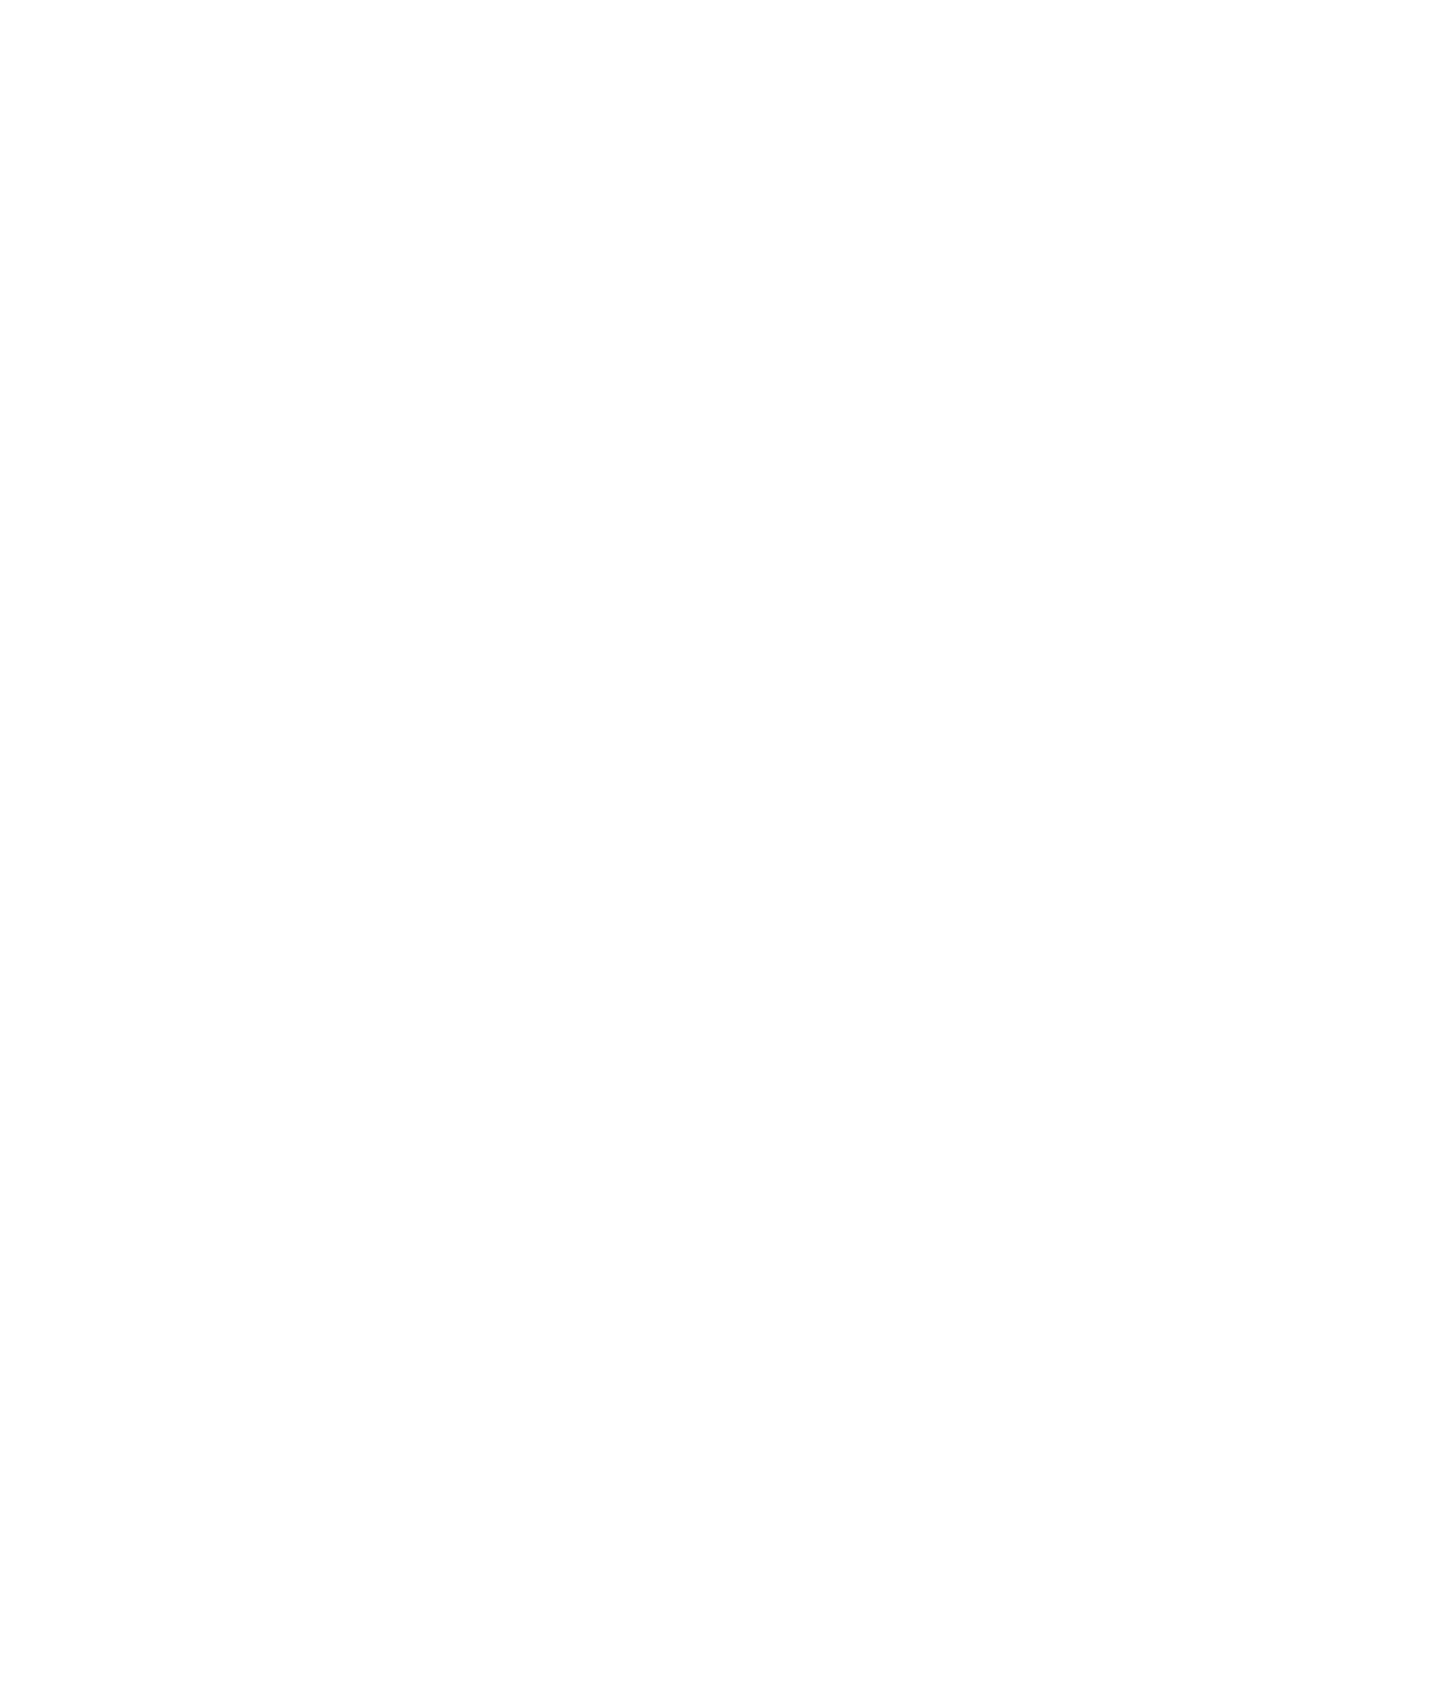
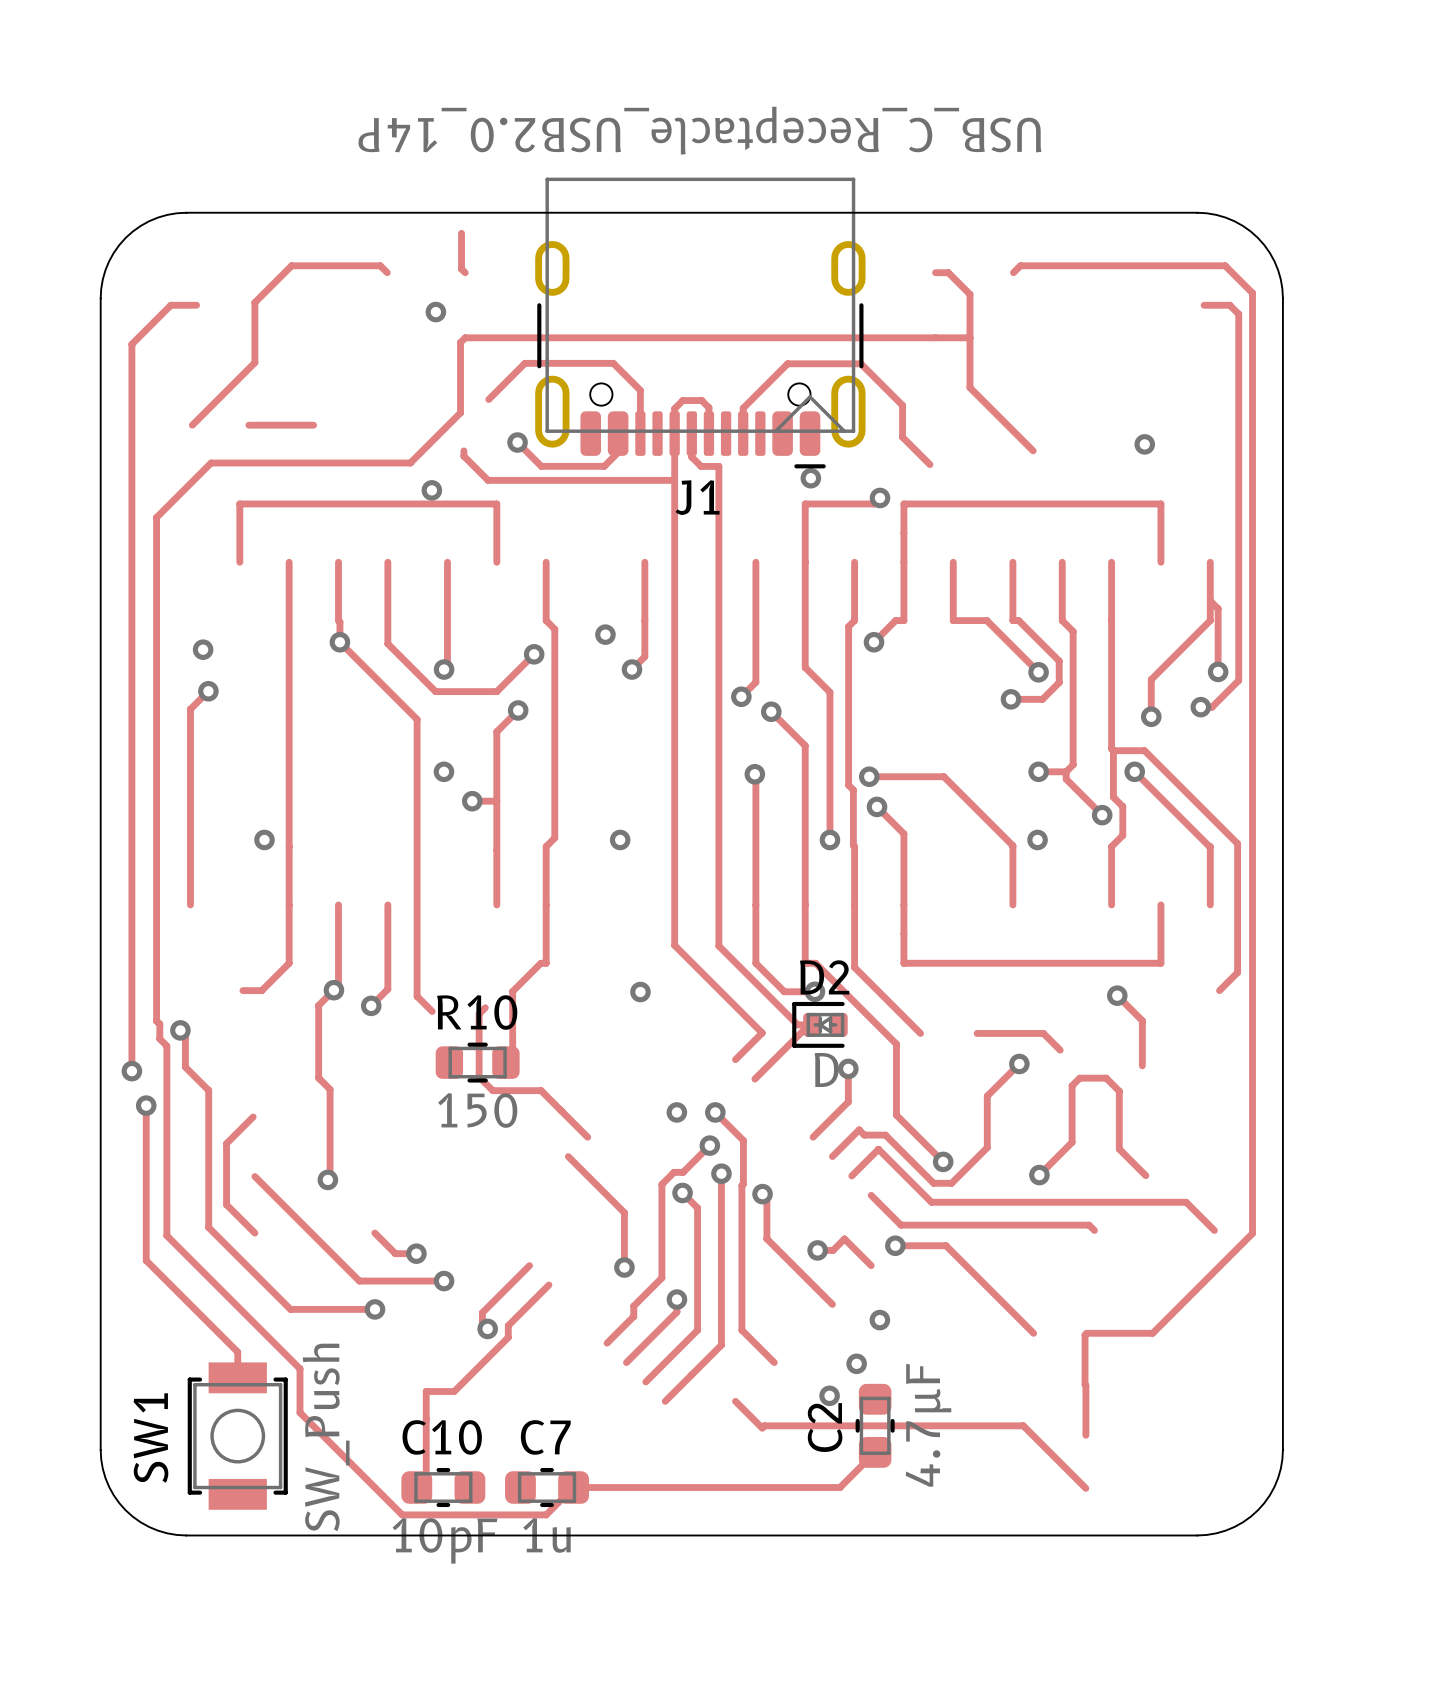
board edge: none -> (186, 212) (1197, 212) (1216, 214) (1234, 221) (1250, 231) (1264, 244) (1278, 270) (1282, 298) (1282, 1449) (1280, 1468) (1274, 1486) (1264, 1503) (1250, 1516) (1225, 1530) (1197, 1535) (186, 1535) (167, 1533) (149, 1527) (132, 1516) (119, 1503) (105, 1478) (100, 1449) (100, 298) (105, 270) (113, 252) (125, 237) (149, 221) (167, 214) (186, 212)
track: none -> (461, 233) (461, 269) (465, 272)
track: none -> (387, 272) (380, 265) (291, 265) (254, 302) (254, 362) (192, 425)
track: none -> (935, 272) (948, 272) (969, 294) (969, 387) (1033, 450)
track: none -> (1013, 272) (1020, 265) (1225, 265) (1252, 293) (1252, 1233) (1152, 1333) (1086, 1333) (1085, 1335) (1085, 1435)
track: none -> (196, 305) (170, 305) (131, 344) (131, 1071)
track: none -> (1204, 305) (1229, 305) (1238, 314) (1238, 680) (1212, 707) (1200, 707)
via: none -> (435, 312)
J1: none -> USB_C_Receptacle_USB2.0_14P (700, 323)
track: none -> (969, 337) (465, 337) (460, 342) (460, 412) (410, 463) (211, 463) (156, 517) (156, 1020) (159, 1024) (159, 1038) (166, 1046) (166, 1235) (300, 1368) (300, 1412) (402, 1514) (546, 1514) (573, 1487) (840, 1487) (875, 1452)
track: none -> (488, 399) (524, 363) (613, 363) (640, 390) (640, 433)
track: none -> (248, 425) (313, 425)
track: none -> (618, 433) (618, 452) (604, 466) (541, 466) (517, 442)
track: none -> (691, 433) (691, 457) (701, 466) (718, 466) (718, 946) (797, 1024) (811, 1024)
track: none -> (708, 433) (708, 407) (701, 400) (682, 400) (674, 408) (674, 945) (762, 1032) (735, 1059)
track: none -> (743, 433) (743, 408) (787, 363) (860, 363) (902, 405) (902, 437) (929, 464)
via: none -> (517, 442)
via: none -> (1144, 444)
track: none -> (463, 450) (463, 456) (488, 480) (674, 480)
via: none -> (810, 478)
via: none -> (431, 490)
track: none -> (880, 497) (874, 503) (805, 503) (805, 667) (829, 692) (829, 840)
via: none -> (880, 497)
track: none -> (239, 562) (239, 503) (496, 503) (496, 562)
track: none -> (289, 562) (289, 963) (261, 990) (242, 990)
track: none -> (338, 562) (339, 642) (417, 719) (417, 996) (432, 1011)
track: none -> (387, 562) (387, 643) (435, 691) (496, 691) (534, 654)
track: none -> (447, 562) (447, 666) (444, 669)
track: none -> (546, 562) (546, 620) (554, 629) (554, 838) (546, 846) (546, 963) (540, 963) (512, 991) (512, 1055) (505, 1062)
track: none -> (644, 562) (644, 656) (631, 669)
track: none -> (755, 562) (755, 682) (741, 696)
track: none -> (854, 562) (854, 620) (848, 626) (848, 785) (853, 790) (854, 967) (920, 1033)
track: none -> (953, 562) (953, 620) (986, 620) (1038, 672)
track: none -> (1012, 562) (1012, 620) (1018, 620) (1059, 661) (1059, 682) (1042, 699) (1010, 699)
track: none -> (1062, 562) (1062, 620) (1073, 631) (1073, 764) (1066, 771)
track: none -> (1111, 562) (1111, 748) (1113, 750)
track: none -> (1160, 562) (1160, 503) (903, 503) (903, 620) (895, 620) (874, 642)
track: none -> (1210, 562) (1210, 620) (1151, 679) (1151, 716)
track: none -> (1210, 600) (1218, 608) (1218, 671)
via: none -> (605, 634)
via: none -> (339, 642)
via: none -> (874, 642)
via: none -> (203, 649)
via: none -> (534, 654)
via: none -> (444, 669)
via: none -> (631, 669)
via: none -> (1218, 671)
via: none -> (1038, 672)
track: none -> (208, 691) (190, 709) (190, 904)
via: none -> (208, 691)
via: none -> (741, 696)
via: none -> (1010, 699)
via: none -> (1200, 707)
track: none -> (518, 710) (496, 731) (496, 904)
via: none -> (518, 710)
track: none -> (771, 711) (805, 745) (805, 963) (815, 963) (896, 1044) (896, 1115) (943, 1161)
via: none -> (771, 711)
via: none -> (1151, 716)
track: none -> (1113, 750) (1144, 750) (1237, 843) (1237, 972) (1219, 990)
track: none -> (1113, 750) (1113, 797) (1122, 806) (1122, 835) (1111, 846) (1111, 904)
via: none -> (443, 771)
track: none -> (1038, 771) (1066, 771)
via: none -> (1038, 771)
track: none -> (1066, 771) (1066, 779) (1102, 815)
track: none -> (1134, 771) (1210, 846) (1210, 904)
via: none -> (1134, 771)
track: none -> (754, 774) (755, 963) (784, 991) (814, 991)
via: none -> (754, 774)
track: none -> (869, 776) (943, 776) (1012, 845) (1012, 904)
via: none -> (869, 776)
track: none -> (472, 801) (496, 801)
via: none -> (472, 801)
track: none -> (877, 806) (903, 833) (903, 963) (1160, 963) (1160, 904)
via: none -> (877, 806)
via: none -> (1102, 815)
via: none -> (264, 839)
via: none -> (620, 839)
via: none -> (1037, 839)
via: none -> (829, 840)
track: none -> (338, 904) (338, 985) (318, 1005) (318, 1078) (330, 1089) (330, 1177) (327, 1179)
track: none -> (387, 904) (387, 989) (371, 1005)
via: none -> (333, 990)
via: none -> (814, 991)
via: none -> (640, 992)
track: none -> (1117, 995) (1142, 1020) (1142, 1065)
via: none -> (1117, 995)
via: none -> (371, 1005)
track: none -> (485, 1007) (479, 1013) (479, 1076) (492, 1090) (541, 1090) (587, 1137)
track: none -> (809, 1024) (754, 1079)
D2: none -> D (819, 1024)
track: none -> (180, 1030) (185, 1035) (185, 1067) (208, 1090) (208, 1227) (290, 1309) (375, 1309)
via: none -> (180, 1030)
track: none -> (977, 1033) (1043, 1033) (1060, 1050)
R10: none -> 150 (477, 1062)
track: none -> (1019, 1063) (987, 1096) (987, 1147) (951, 1183) (933, 1183) (885, 1135) (864, 1135) (859, 1129) (832, 1156)
via: none -> (1019, 1063)
track: none -> (848, 1068) (848, 1101) (813, 1137)
via: none -> (848, 1068)
via: none -> (131, 1071)
track: none -> (146, 1105) (146, 1260) (237, 1352) (237, 1377)
via: none -> (146, 1105)
via: none -> (676, 1112)
track: none -> (715, 1112) (743, 1140) (741, 1330) (774, 1362)
via: none -> (715, 1112)
track: none -> (253, 1116) (226, 1143) (226, 1204) (254, 1233)
track: none -> (709, 1145) (683, 1172) (674, 1172) (661, 1184) (661, 1277) (633, 1306) (633, 1316) (607, 1343)
via: none -> (709, 1145)
track: none -> (568, 1156) (624, 1212) (624, 1267)
via: none -> (943, 1161)
track: none -> (721, 1173) (721, 1345) (665, 1401)
via: none -> (721, 1173)
track: none -> (851, 1175) (878, 1149) (931, 1202) (1186, 1202) (1214, 1230)
track: none -> (1039, 1175) (1072, 1142) (1072, 1085) (1079, 1078) (1106, 1078) (1119, 1091) (1119, 1149) (1145, 1175)
via: none -> (1039, 1175)
track: none -> (254, 1176) (359, 1281) (444, 1281)
via: none -> (327, 1179)
track: none -> (682, 1192) (697, 1207) (697, 1330) (645, 1381)
via: none -> (682, 1192)
track: none -> (762, 1194) (766, 1198) (766, 1238) (832, 1304)
via: none -> (762, 1194)
track: none -> (871, 1195) (900, 1225) (1089, 1225) (1094, 1230)
track: none -> (374, 1233) (395, 1253) (416, 1253)
track: none -> (895, 1245) (946, 1245) (1033, 1333)
via: none -> (895, 1245)
track: none -> (817, 1250) (833, 1250) (844, 1238) (871, 1265)
via: none -> (817, 1250)
via: none -> (416, 1253)
track: none -> (529, 1265) (482, 1312) (482, 1323) (487, 1328)
via: none -> (624, 1267)
via: none -> (444, 1281)
track: none -> (548, 1285) (508, 1325) (508, 1337) (454, 1391) (426, 1391) (426, 1478) (416, 1487)
track: none -> (676, 1299) (676, 1312) (626, 1362)
via: none -> (676, 1299)
via: none -> (375, 1309)
via: none -> (879, 1320)
via: none -> (487, 1328)
via: none -> (856, 1363)
via: none -> (829, 1395)
track: none -> (735, 1401) (762, 1428) (764, 1425) (1023, 1425) (1085, 1488)
C2: none -> 4.7µF (875, 1425)
SW1: none -> SW_Push (237, 1436)
C10: none -> 10pF (443, 1487)
C7: none -> 1u (547, 1487)

